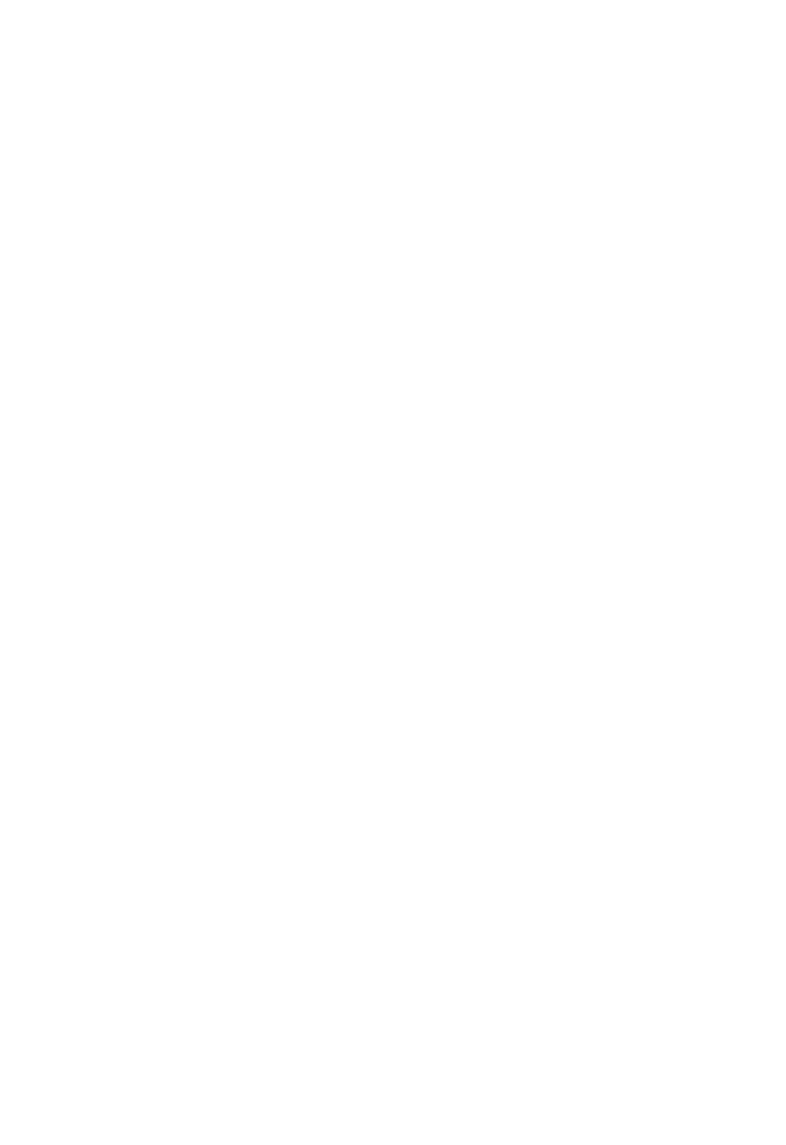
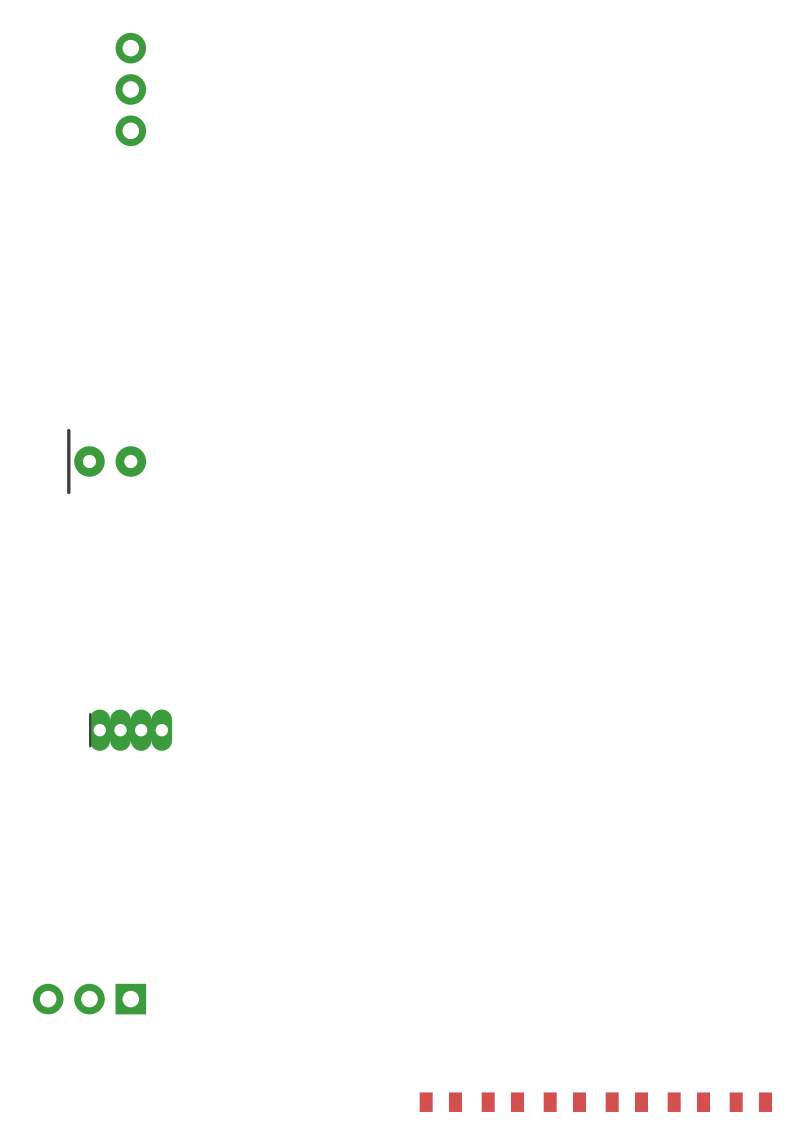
part: none -> (130, 89)
part: none -> (106, 461)
part: none -> (130, 730)
part: none -> (89, 999)
part: none -> (440, 1102)
part: none -> (502, 1102)
part: none -> (564, 1102)
part: none -> (626, 1102)
part: none -> (688, 1102)
part: none -> (750, 1102)

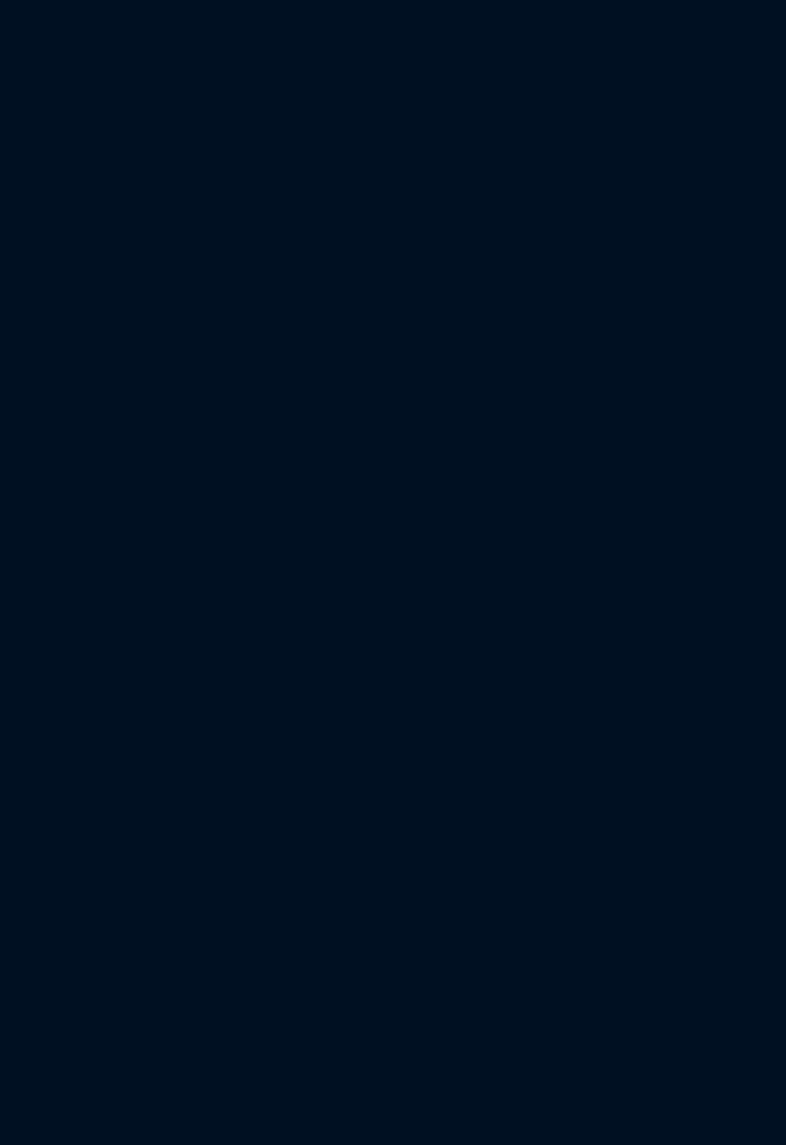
part: (130, 89) -> none
part: (106, 461) -> none
part: (130, 730) -> none
part: (89, 999) -> none
part: (440, 1102) -> none
part: (502, 1102) -> none
part: (564, 1102) -> none
part: (626, 1102) -> none
part: (688, 1102) -> none
part: (750, 1102) -> none

